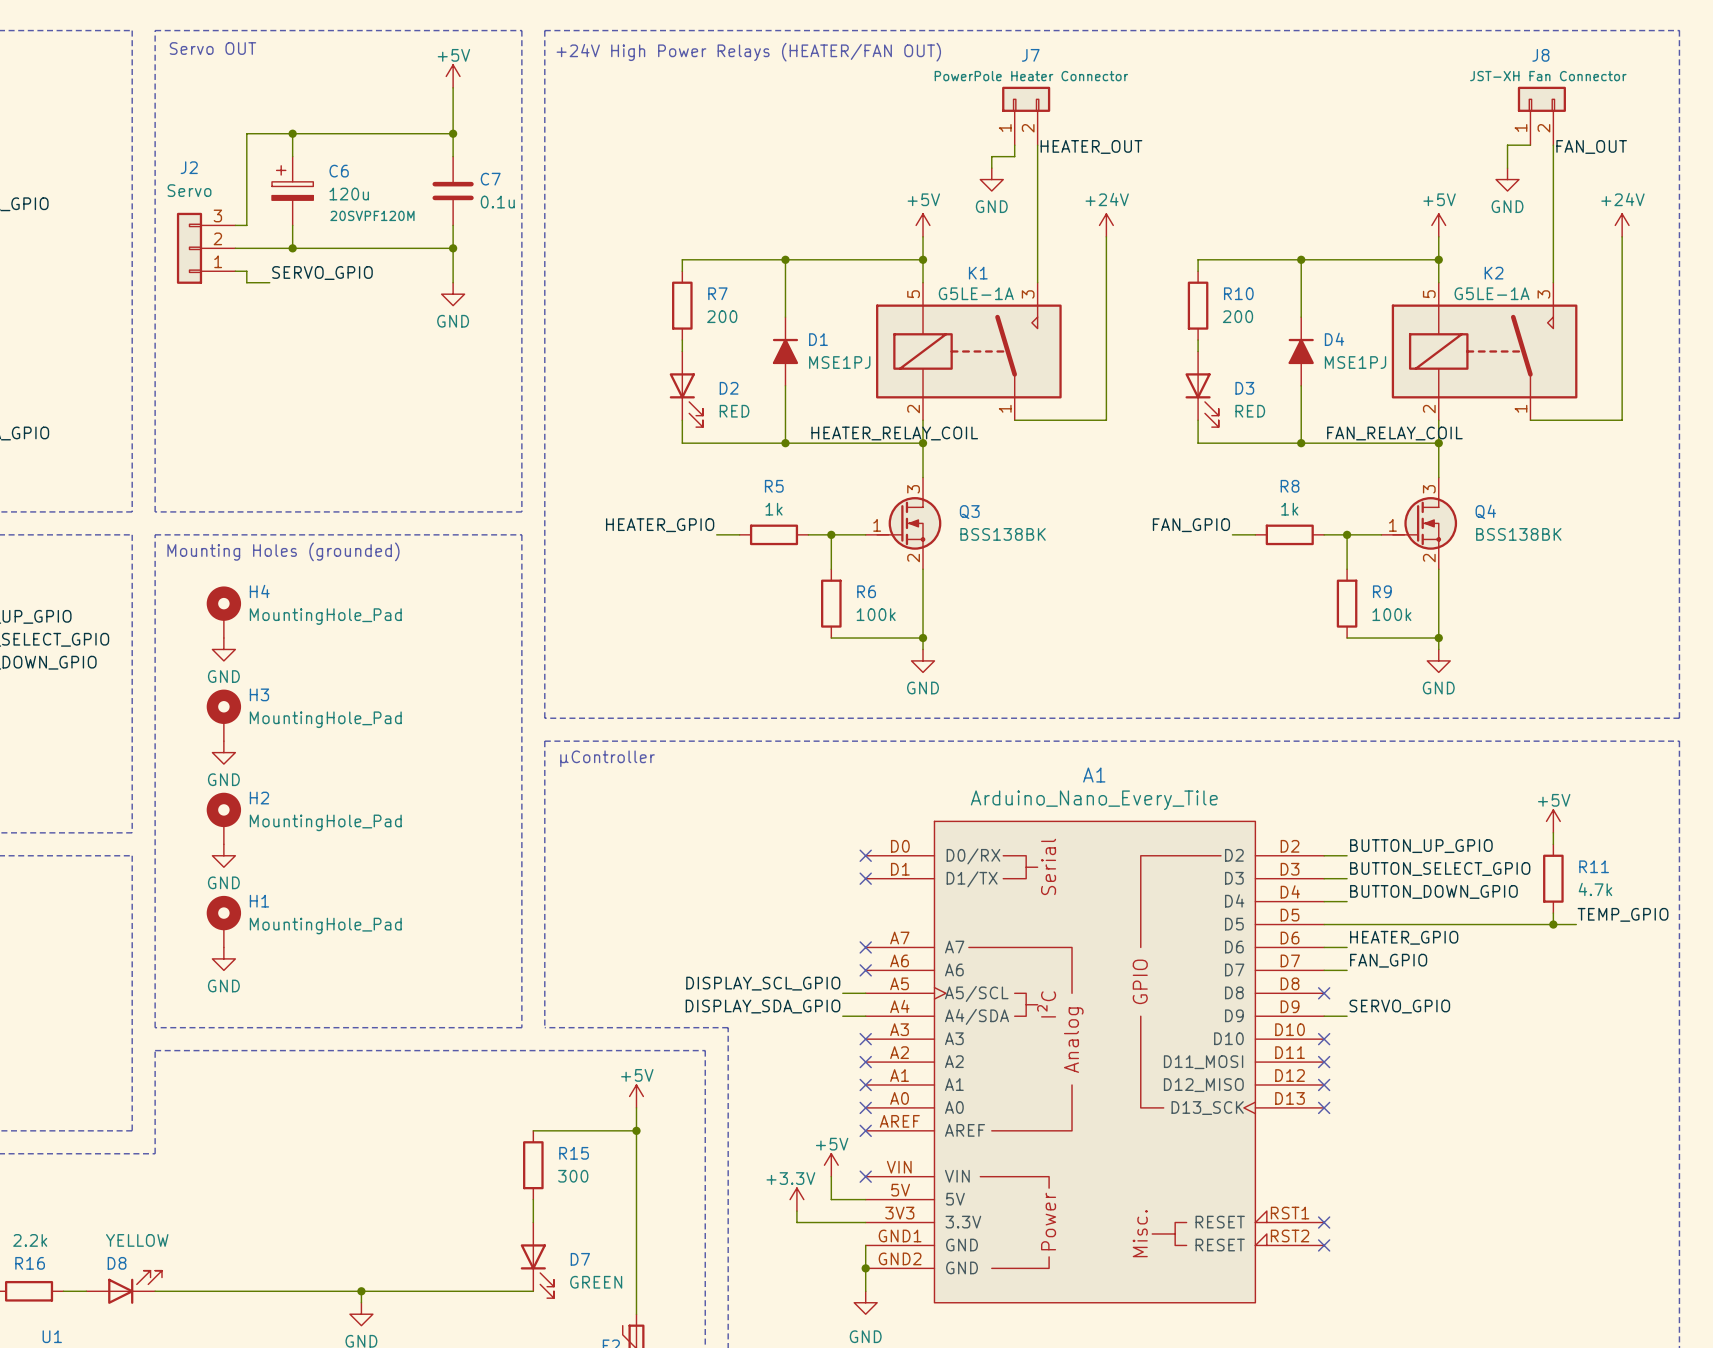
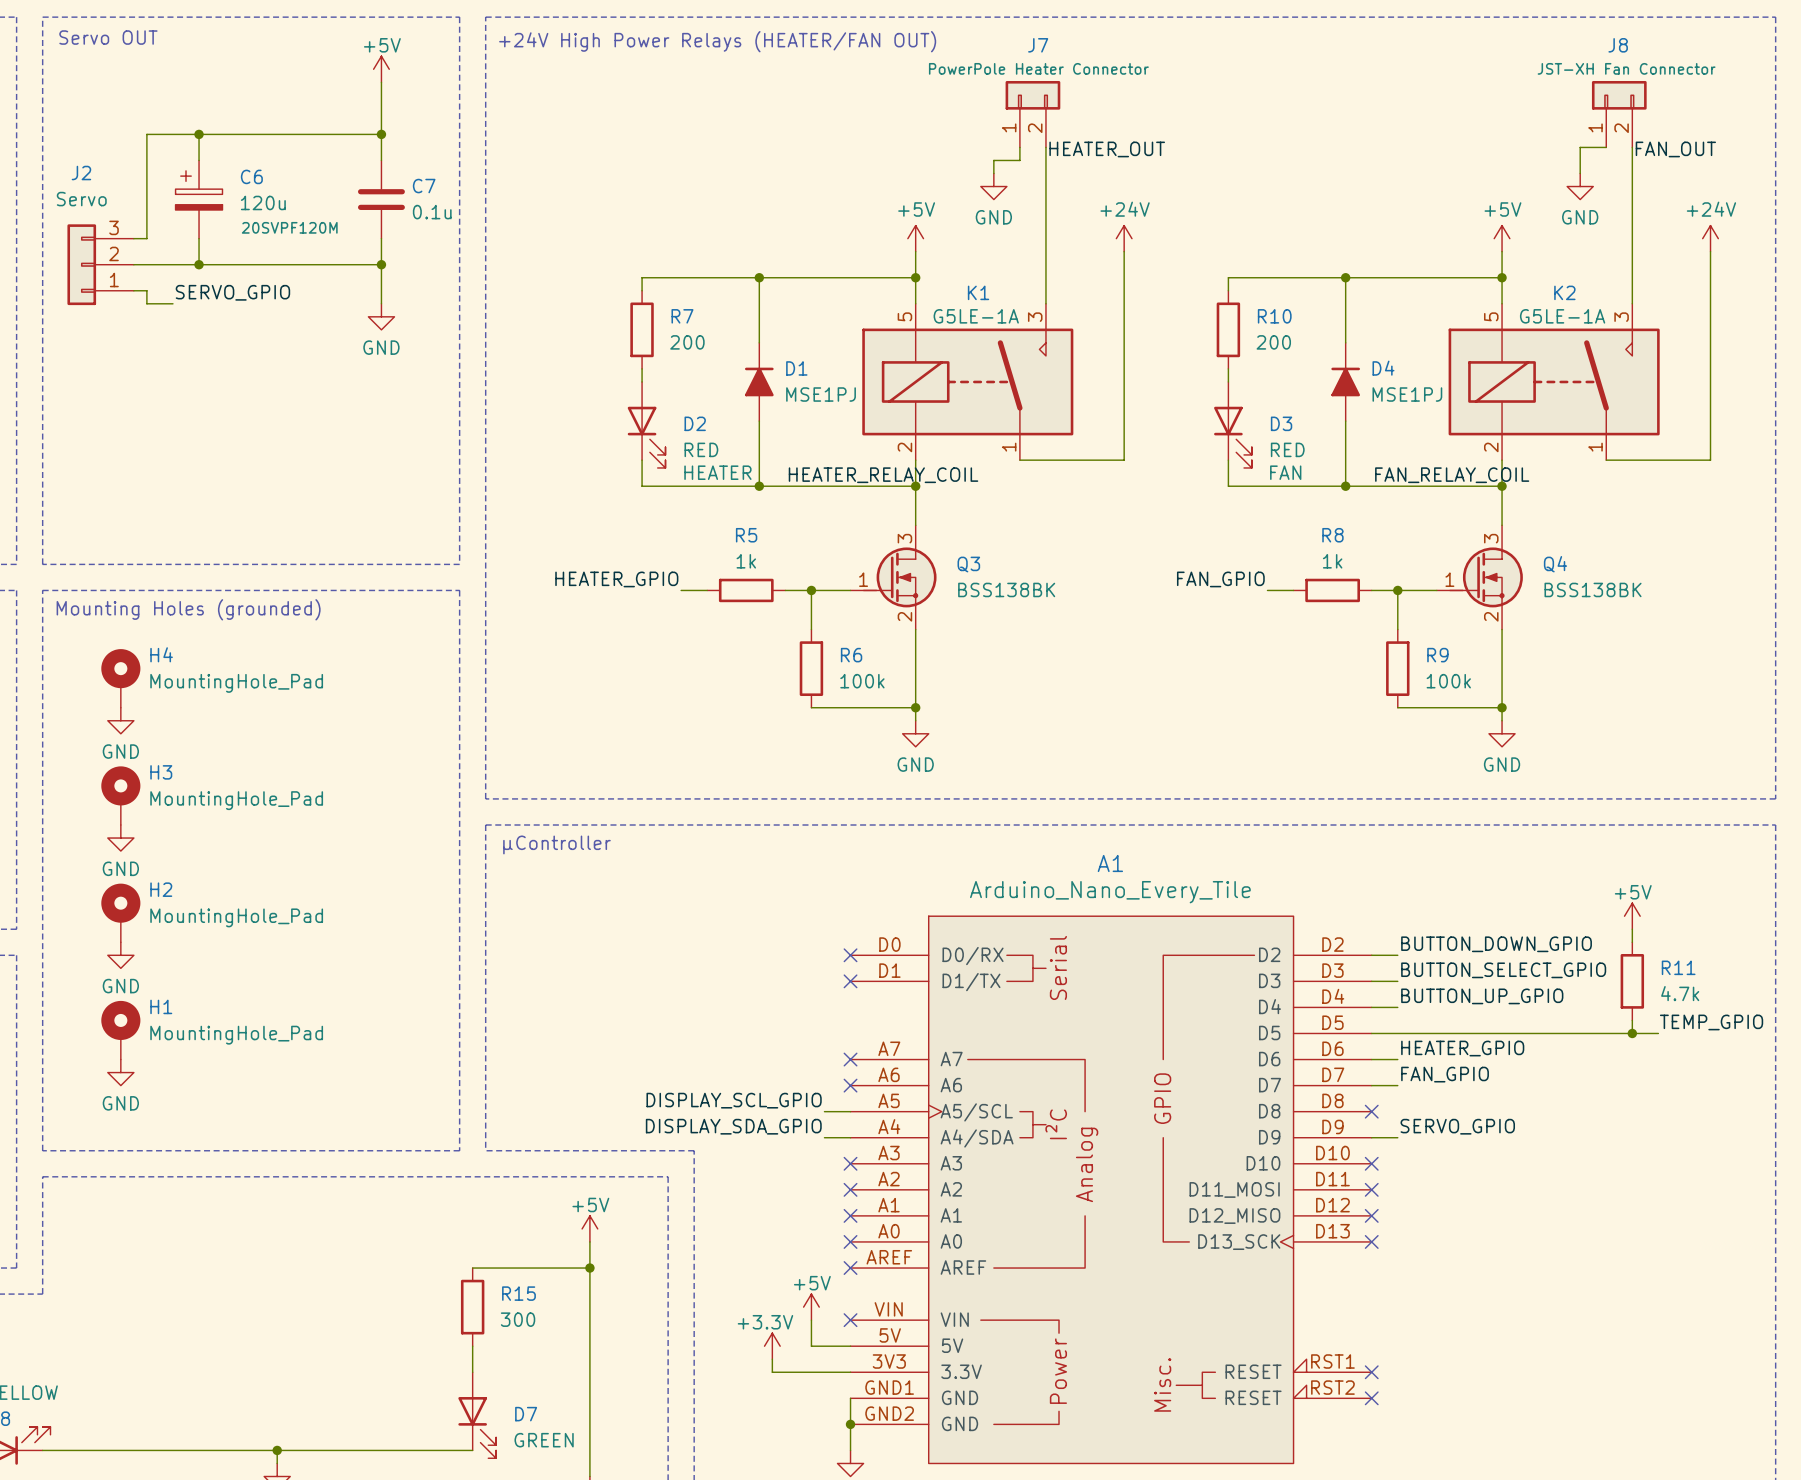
D2 text: none -> HEATER (717, 472)
D3 text: none -> FAN (1285, 472)
label: BUTTON_UP_GPIO (1421, 846) -> BUTTON_DOWN_GPIO (1496, 944)
label: BUTTON_DOWN_GPIO (1433, 891) -> BUTTON_UP_GPIO (1482, 996)

